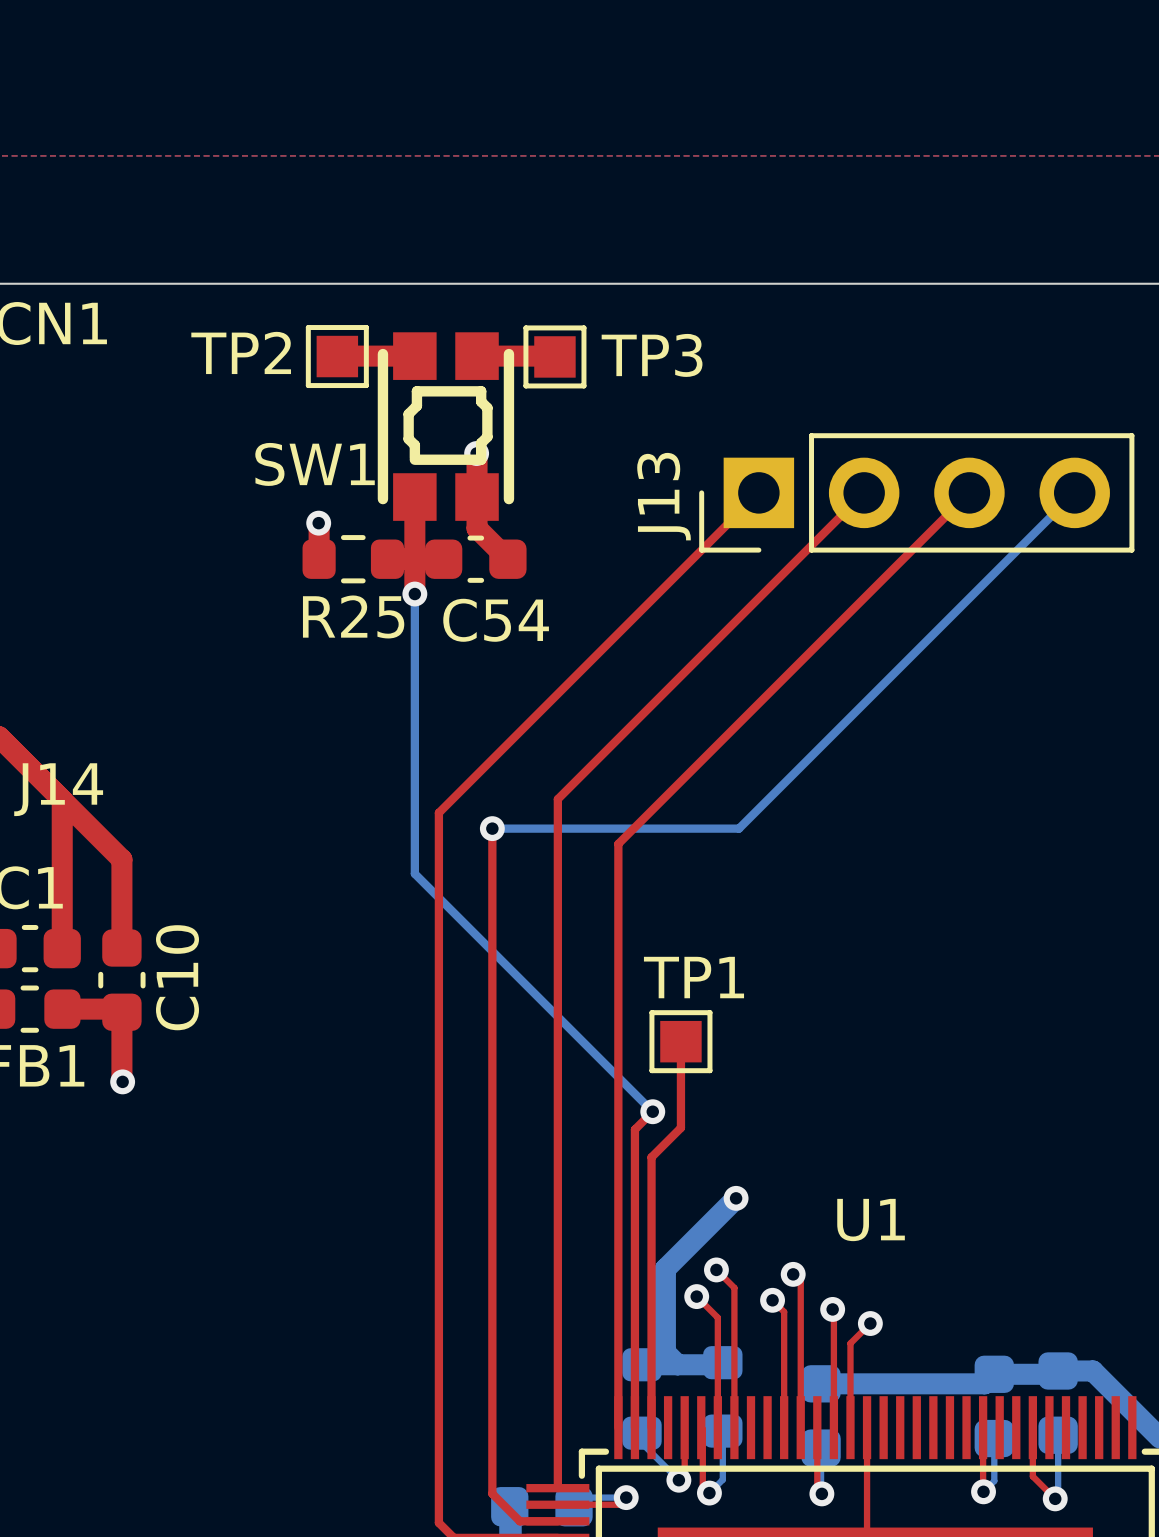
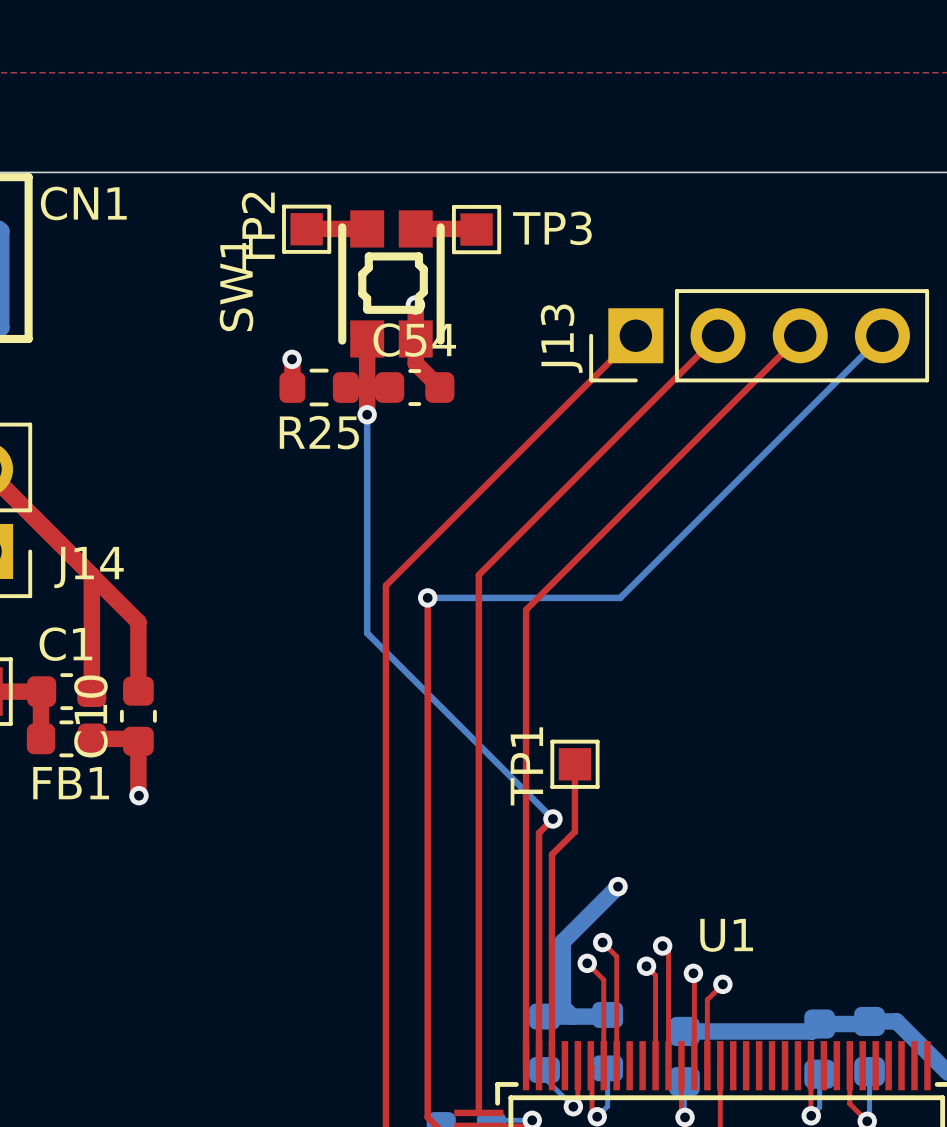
TP2 name rotation: 0° (241, 352) -> 90° counterclockwise (258, 231)
SW1 name rotation: 0° (315, 464) -> 90° counterclockwise (236, 284)
C54 name position: C54 (496, 620) -> C54 (414, 340)
C10 name position: C10 (177, 977) -> C10 (90, 716)
TP1 name rotation: 0° (693, 977) -> 90° counterclockwise (526, 766)
U1 name position: U1 (871, 1220) -> U1 (726, 935)

